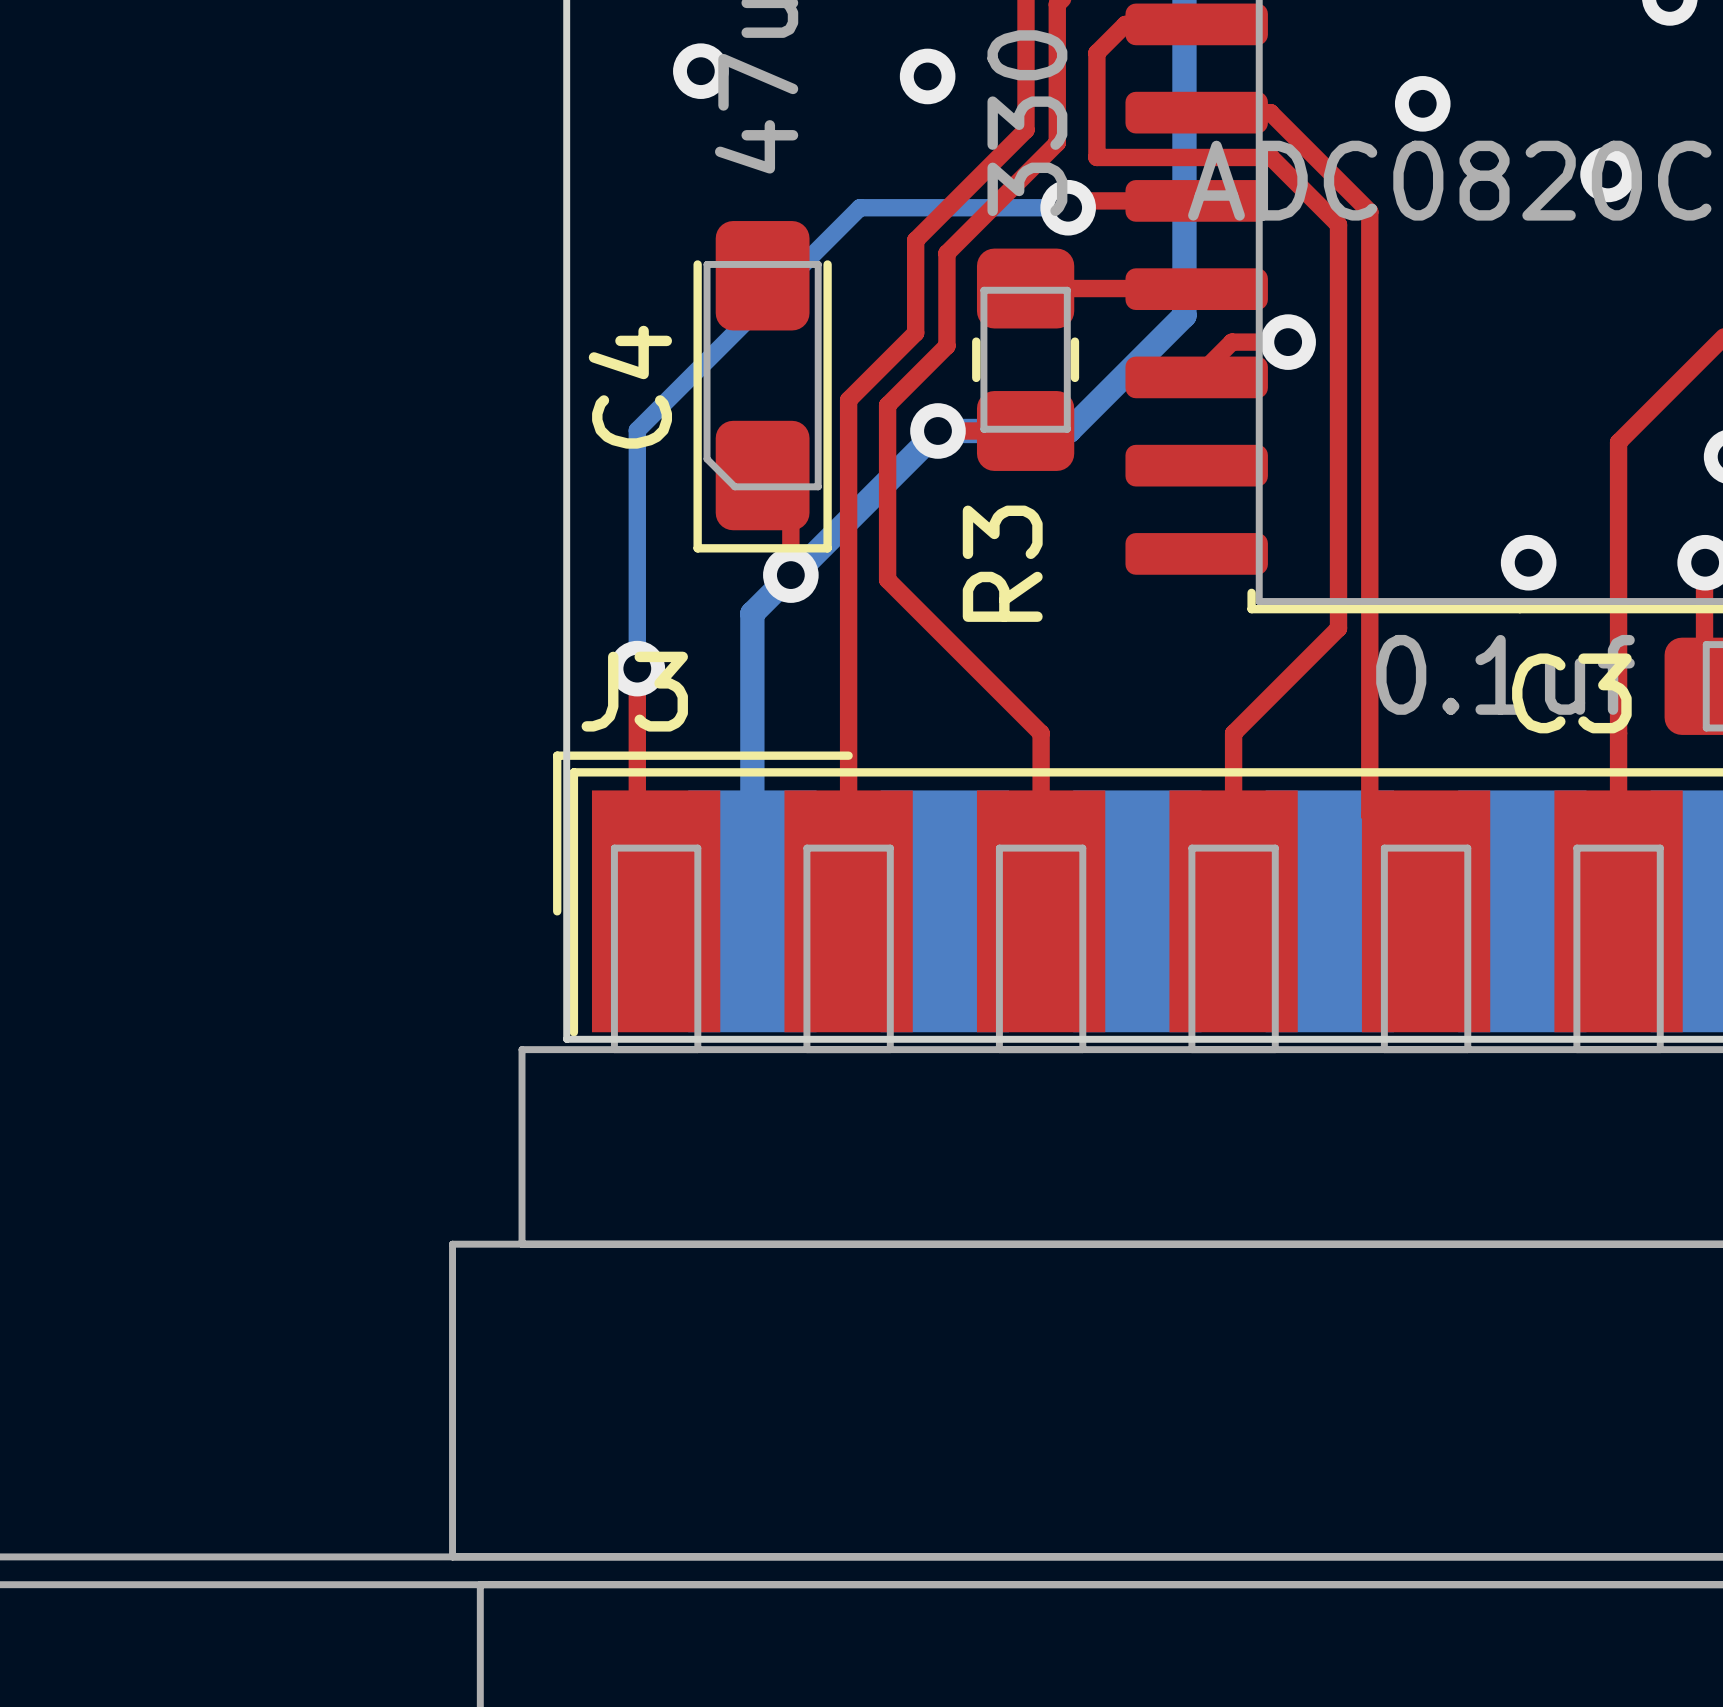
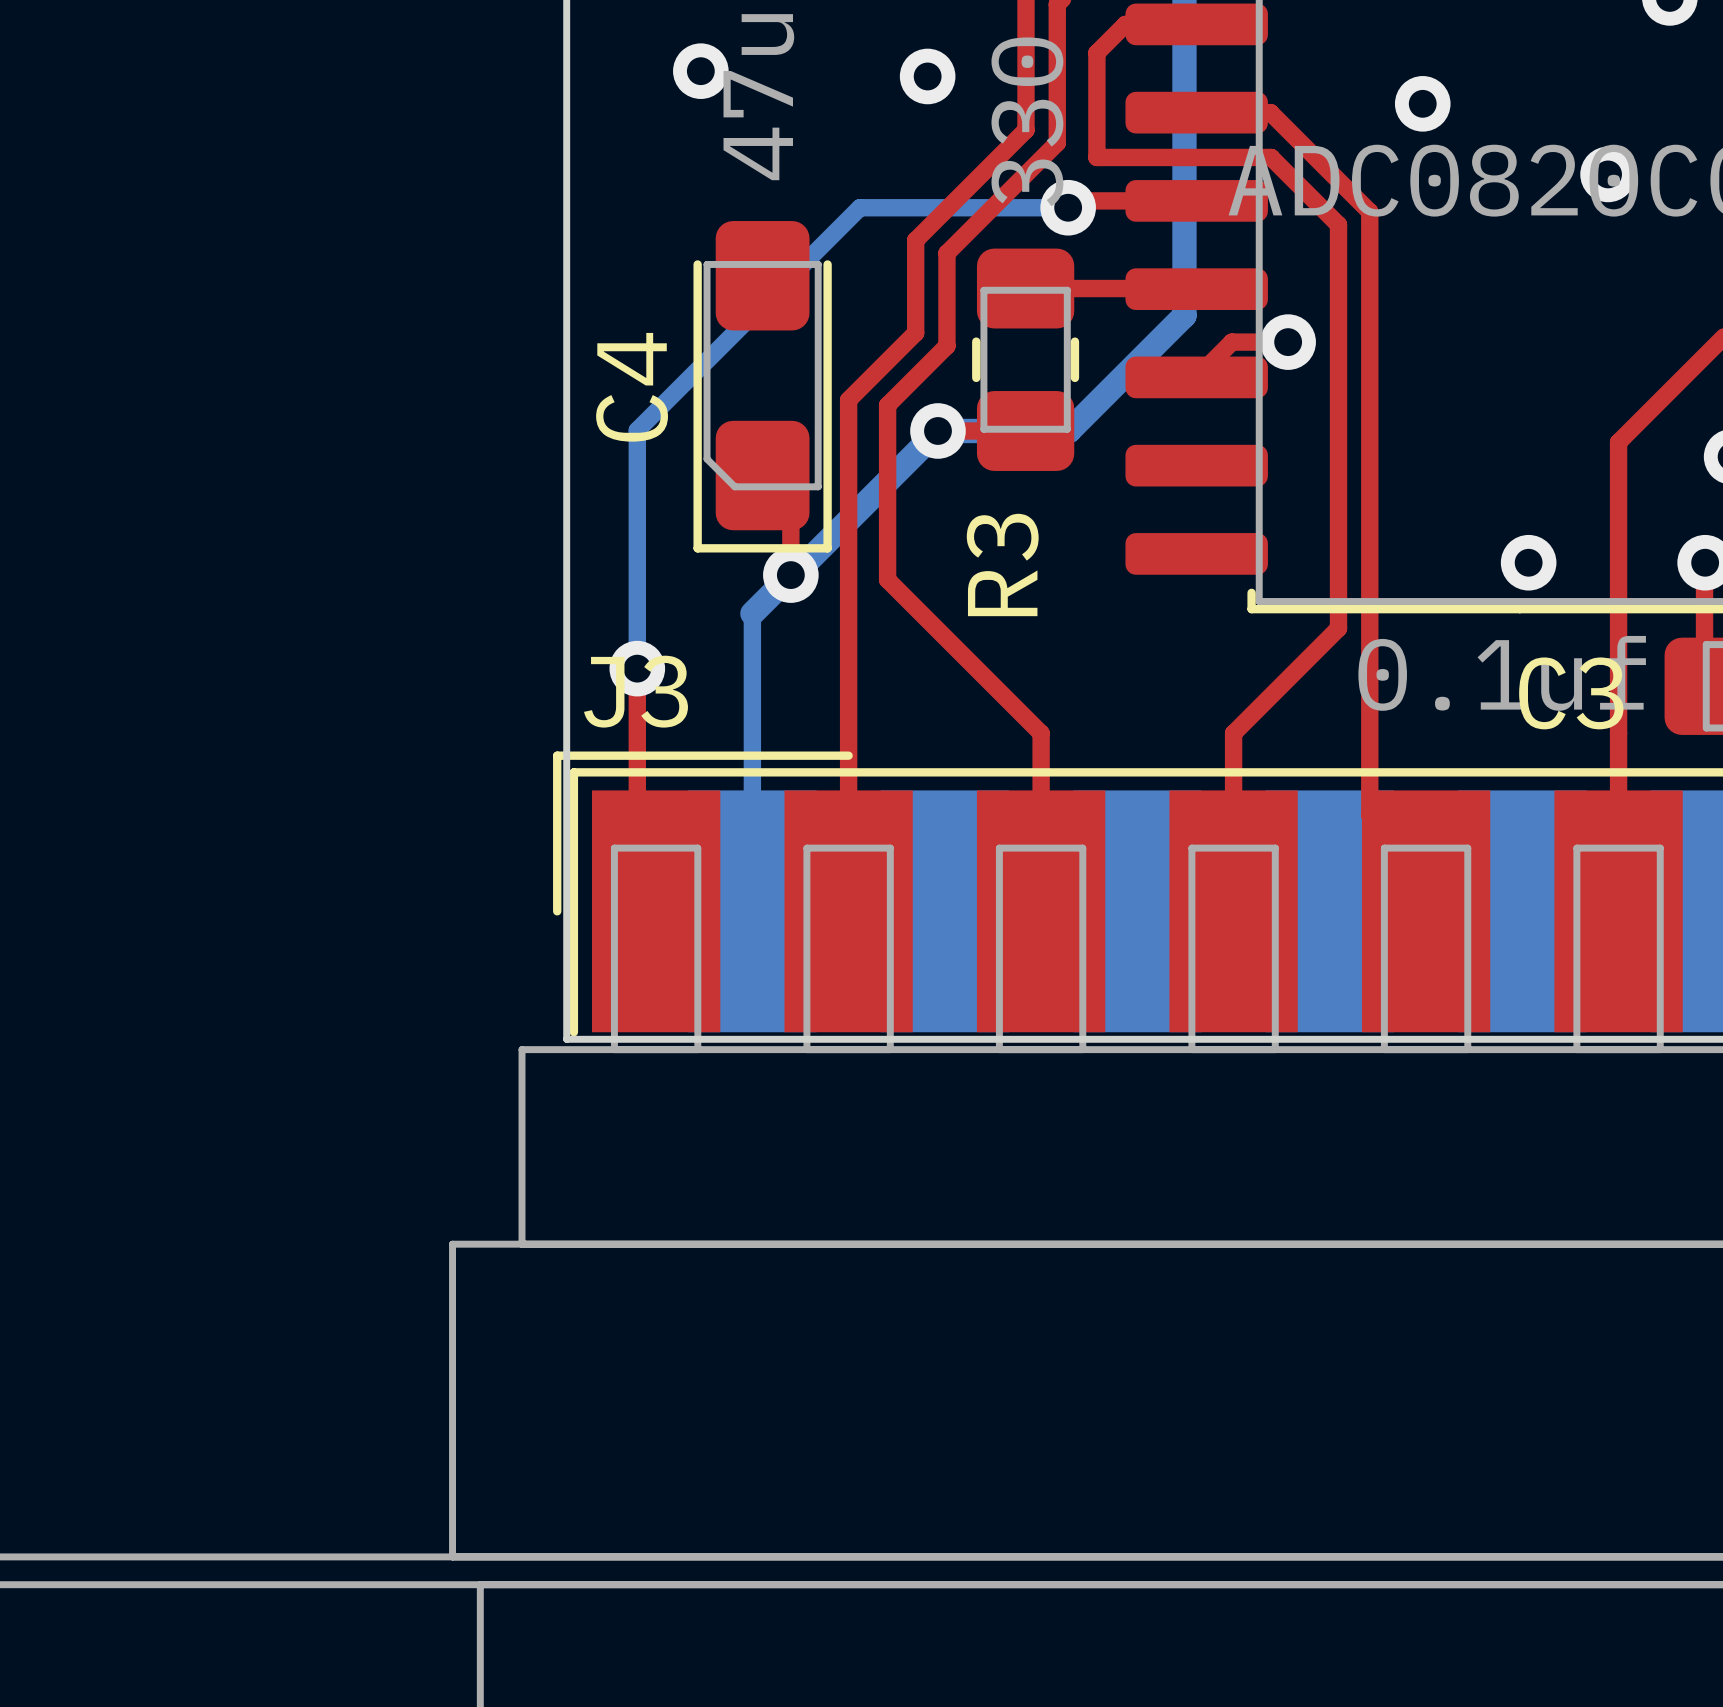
bottom track width: thick (752, 613) (752, 871) -> thin (752, 613) (752, 871)

